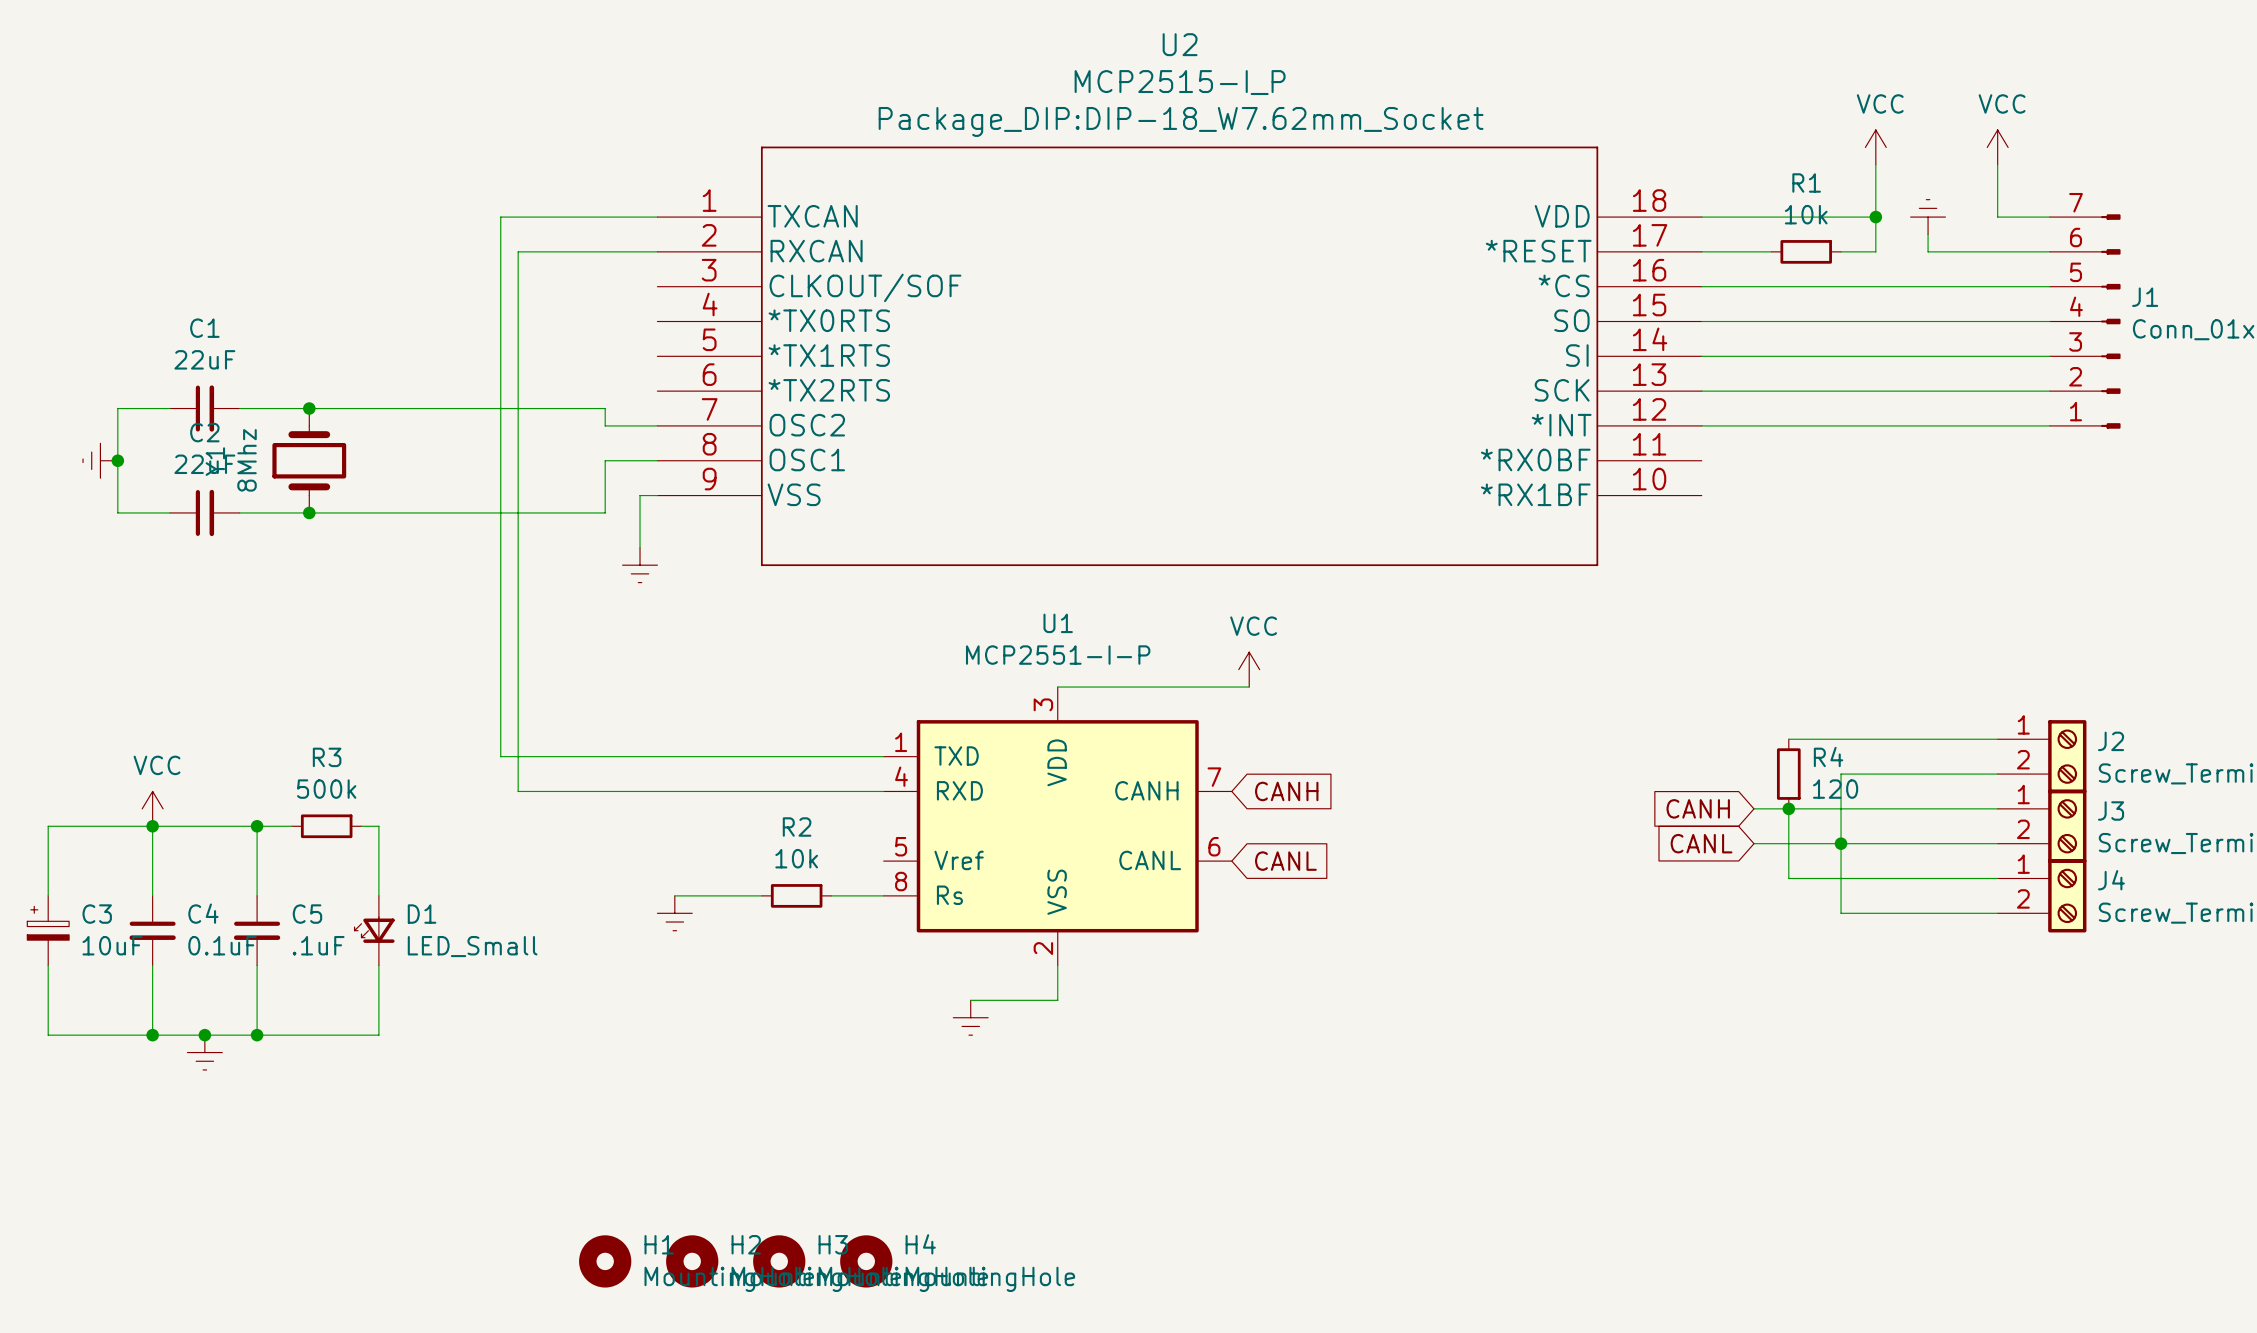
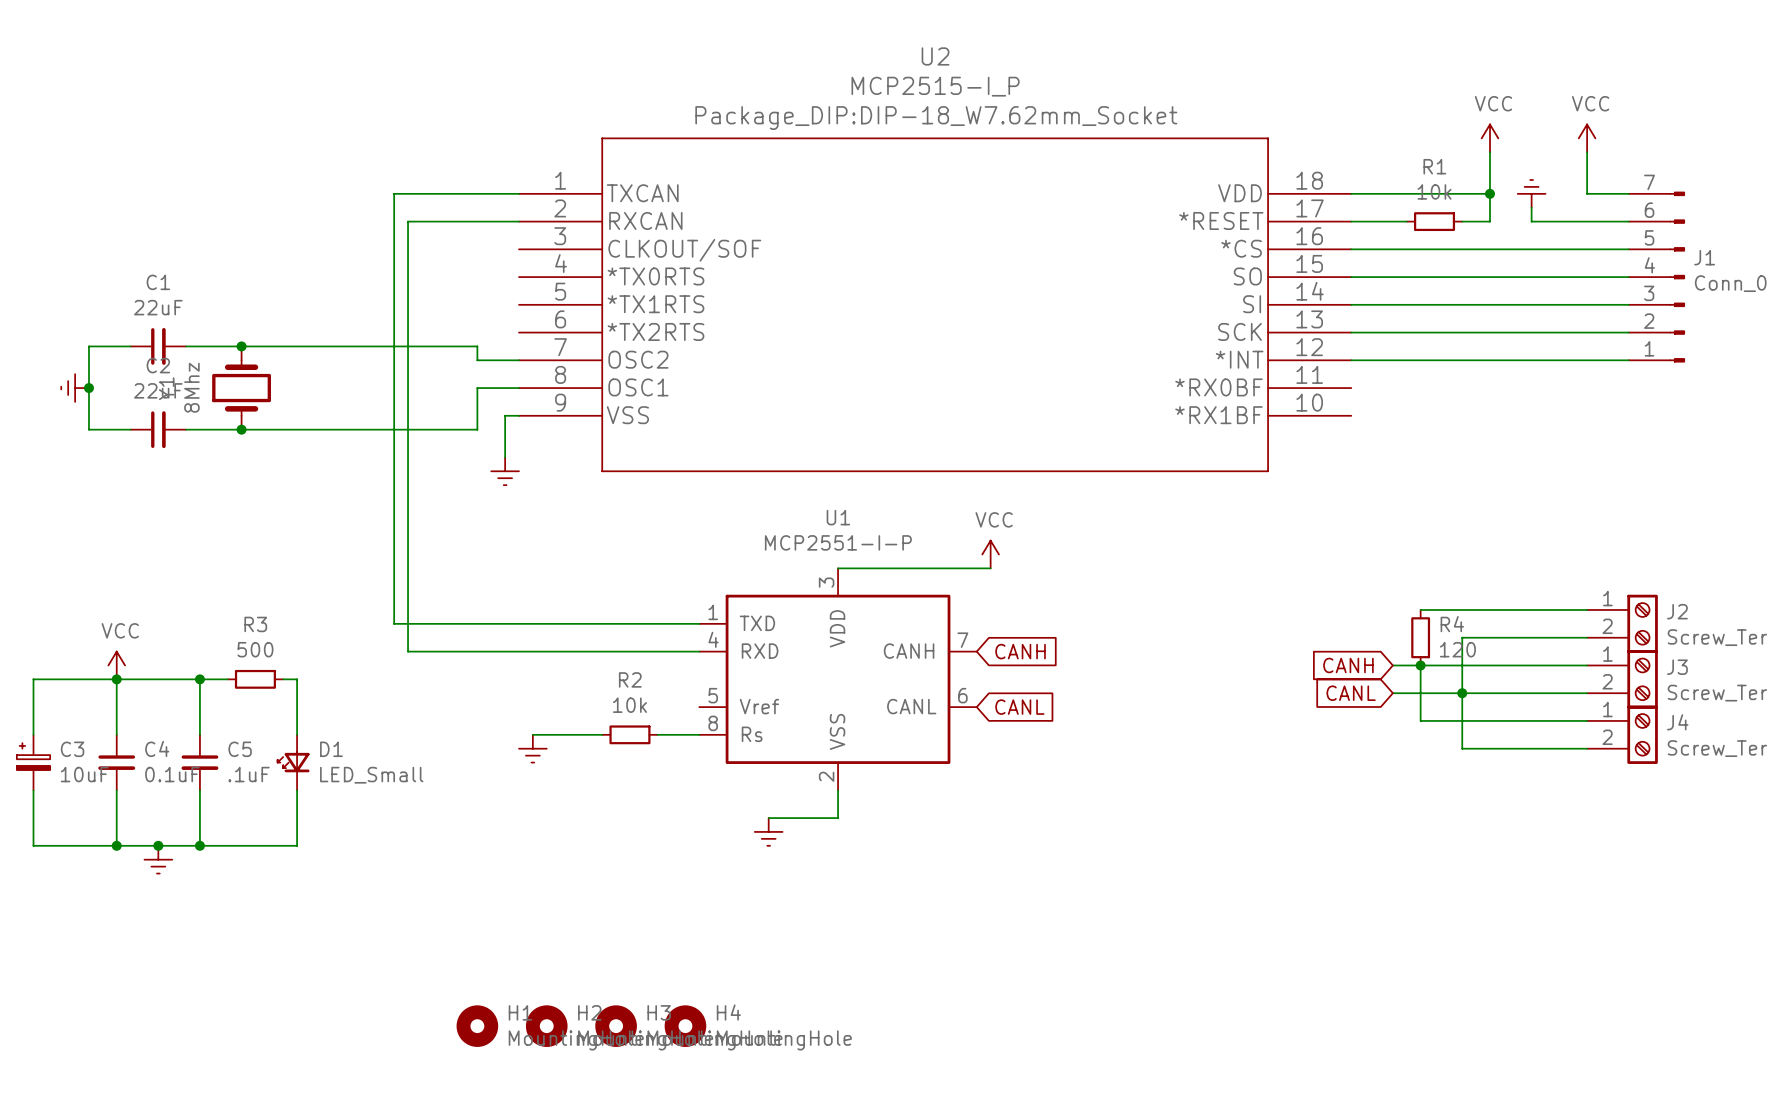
R3 value: 500k (326, 789) -> 500 (255, 649)

